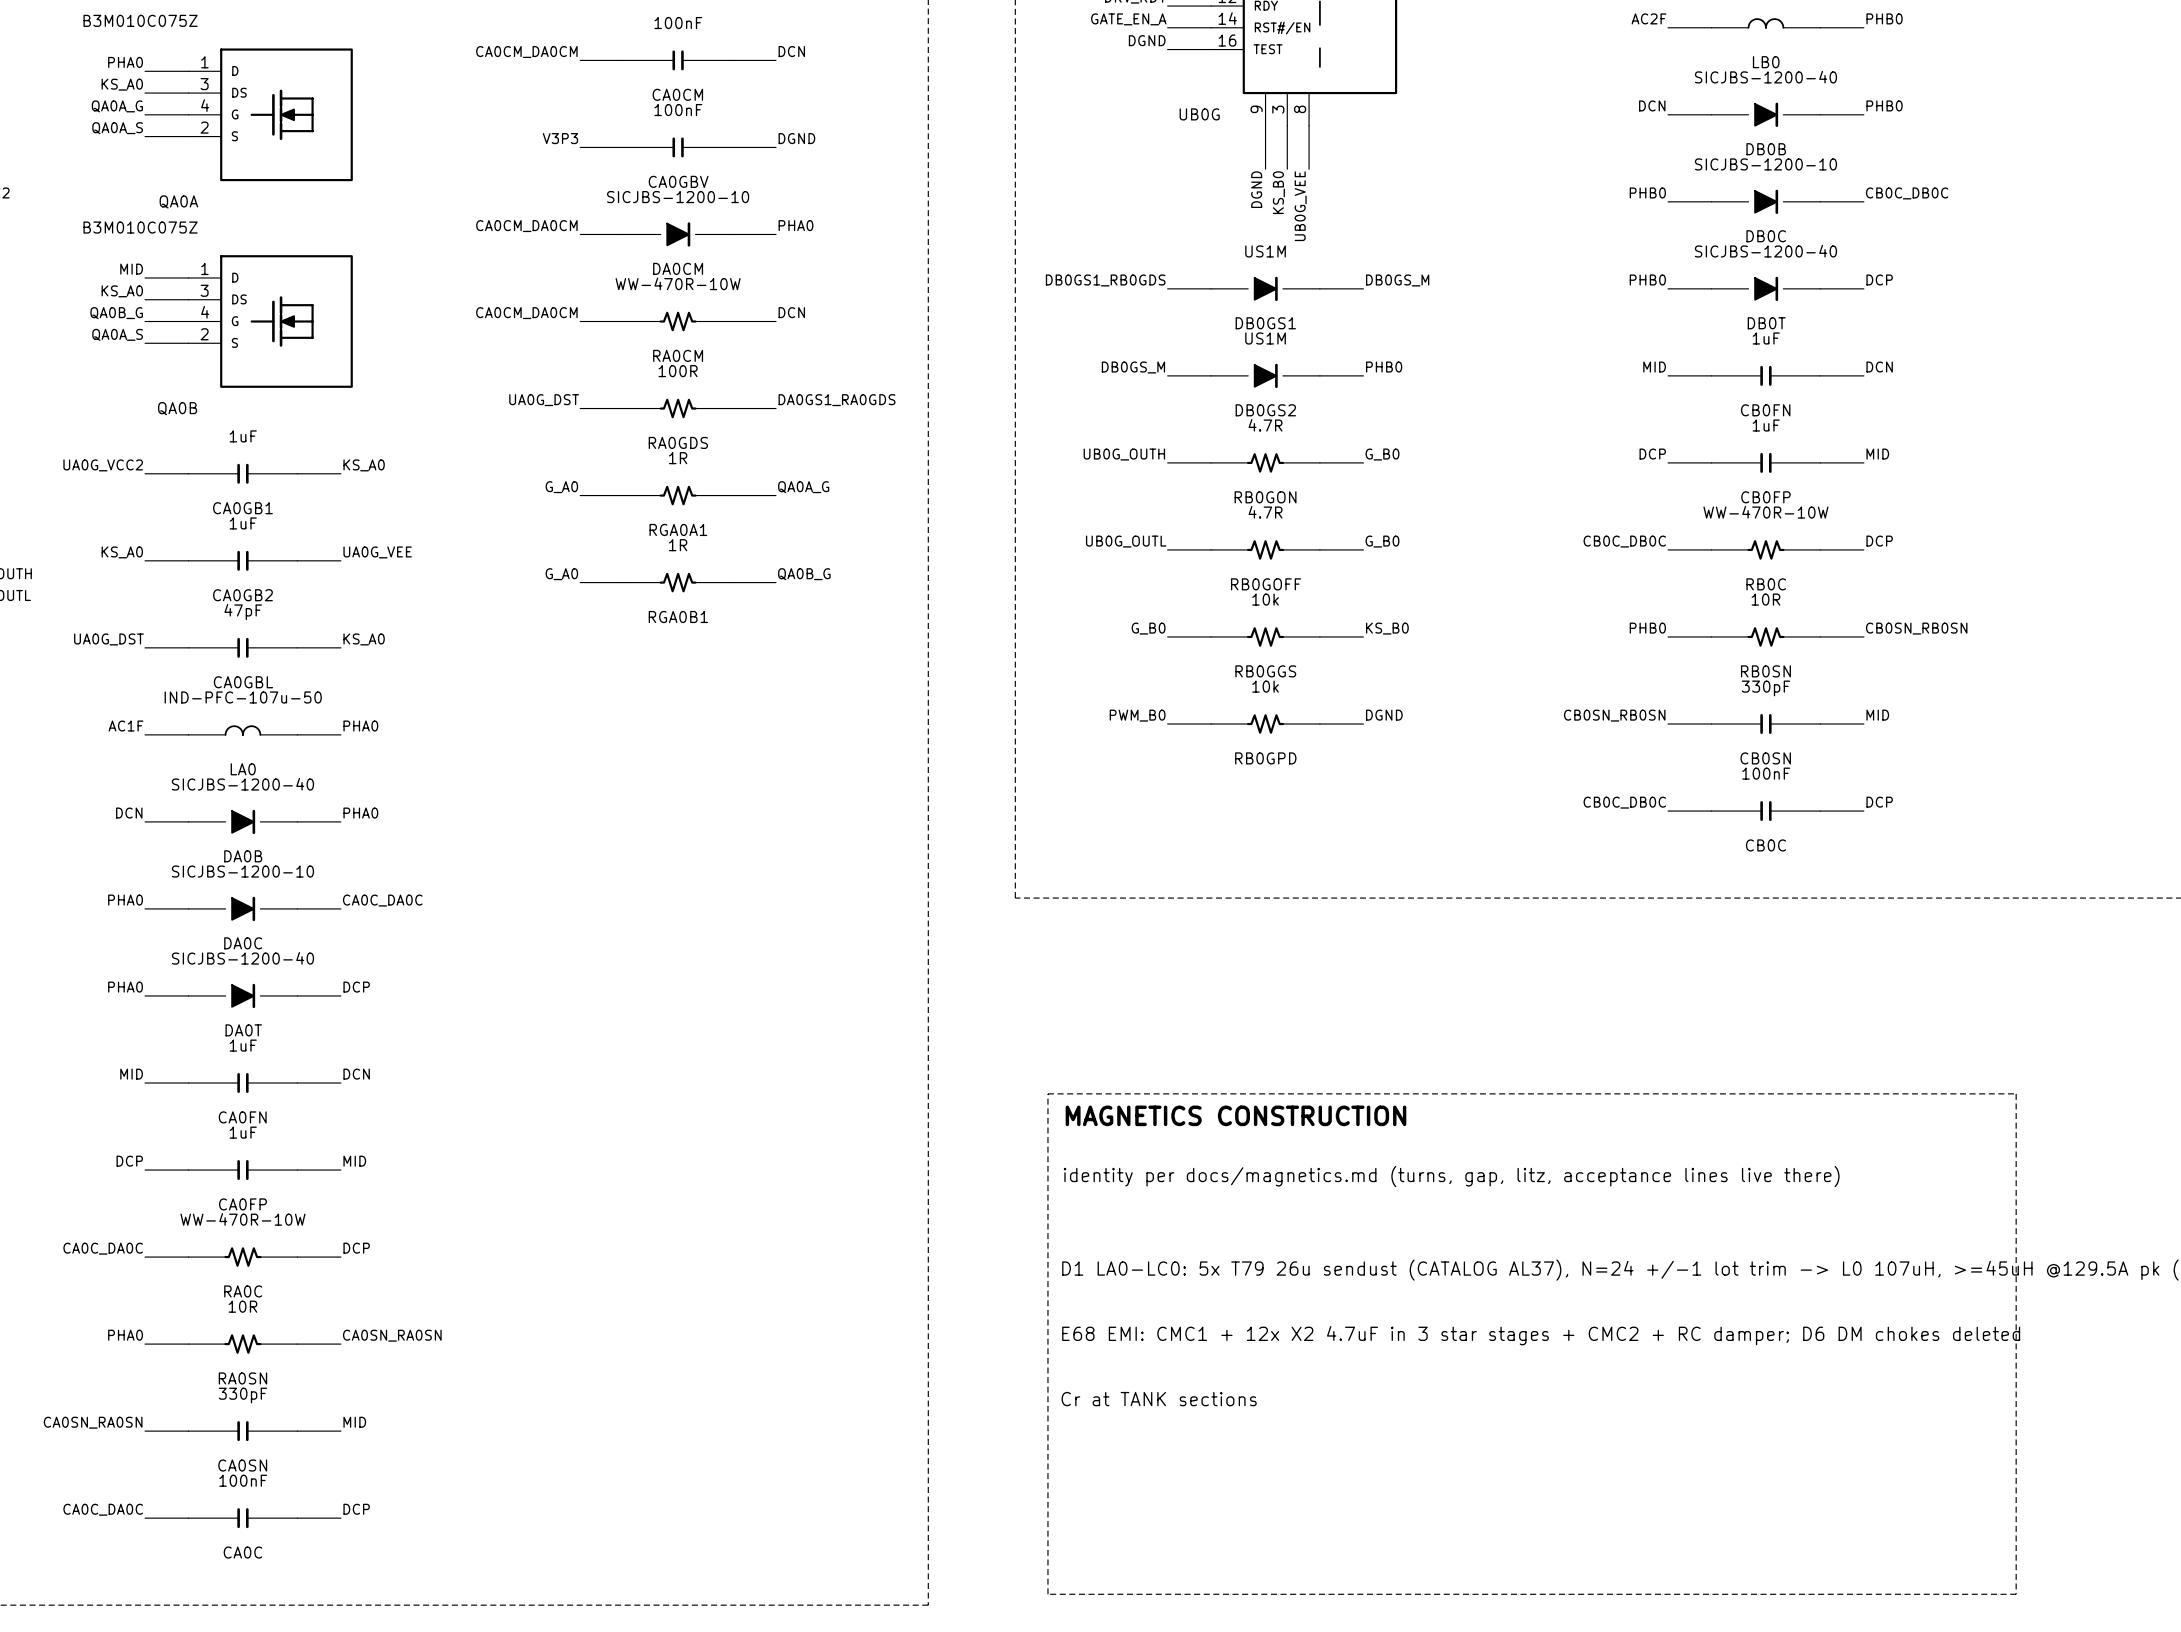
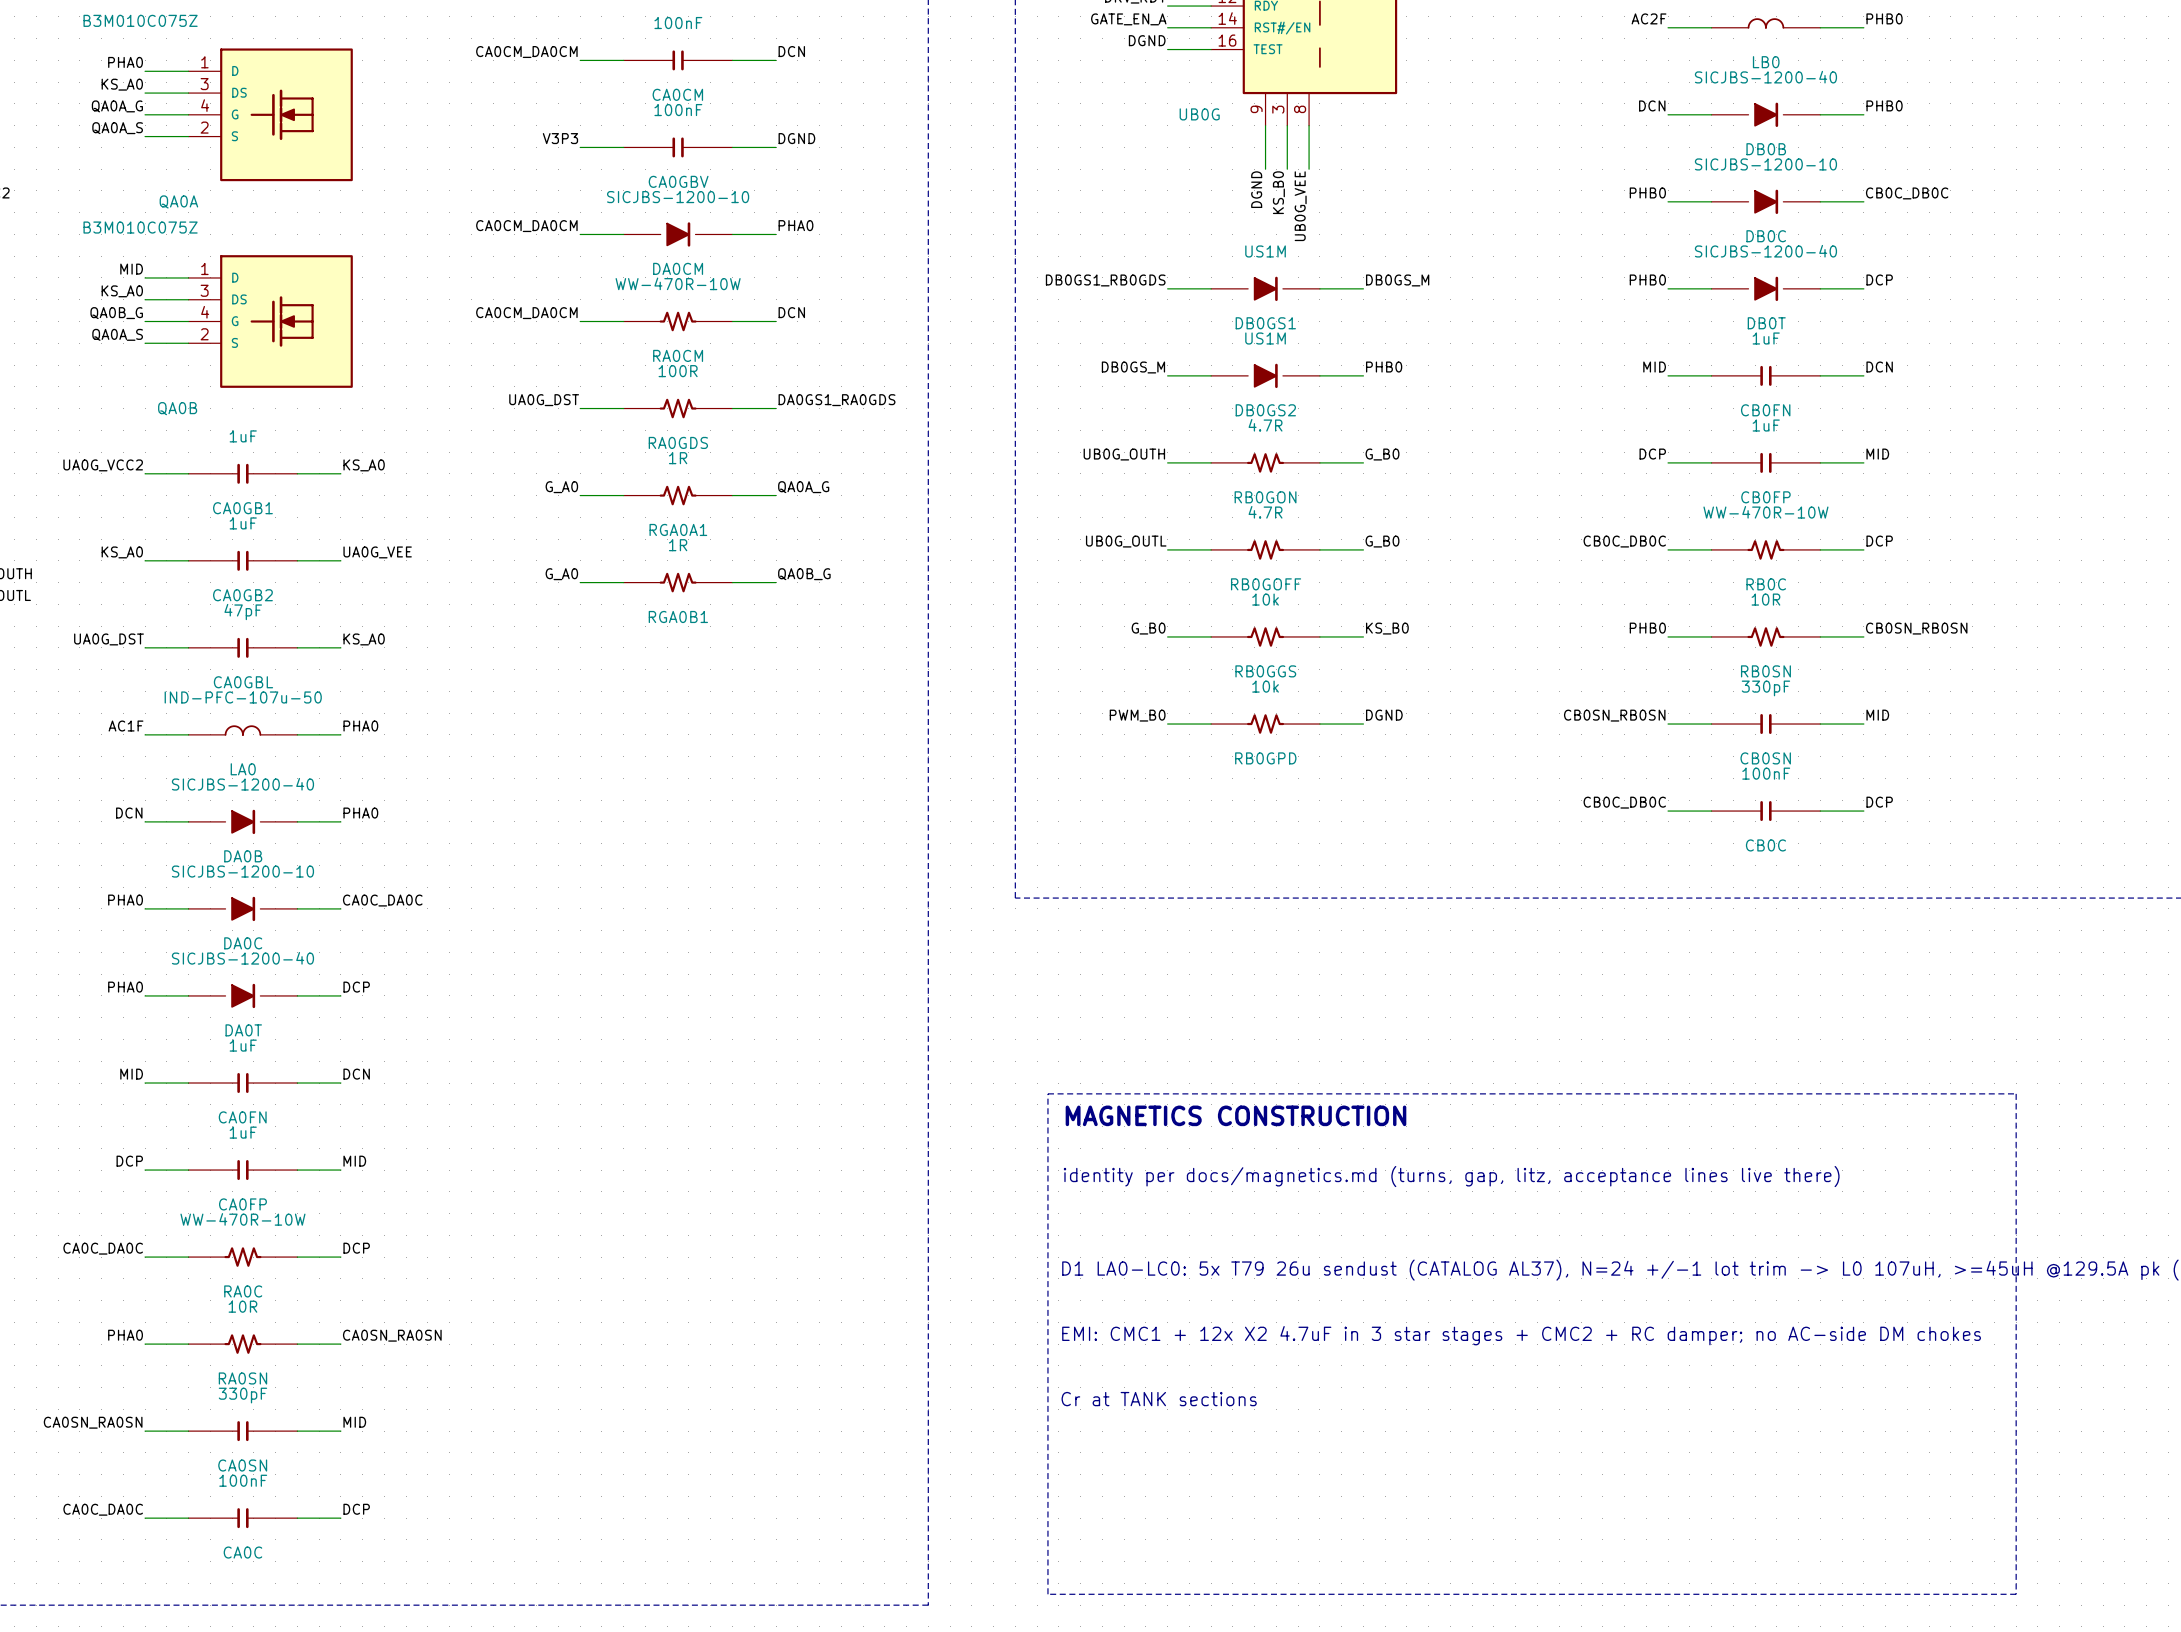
text: E68 EMI: CMC1 + 12x X2 4.7uF in 3 star stages + CMC2 + RC damper; D6 DM chokes deleted (1541, 1335) -> EMI: CMC1 + 12x X2 4.7uF in 3 star stages + CMC2 + RC damper; no AC-side DM chokes (1521, 1335)

